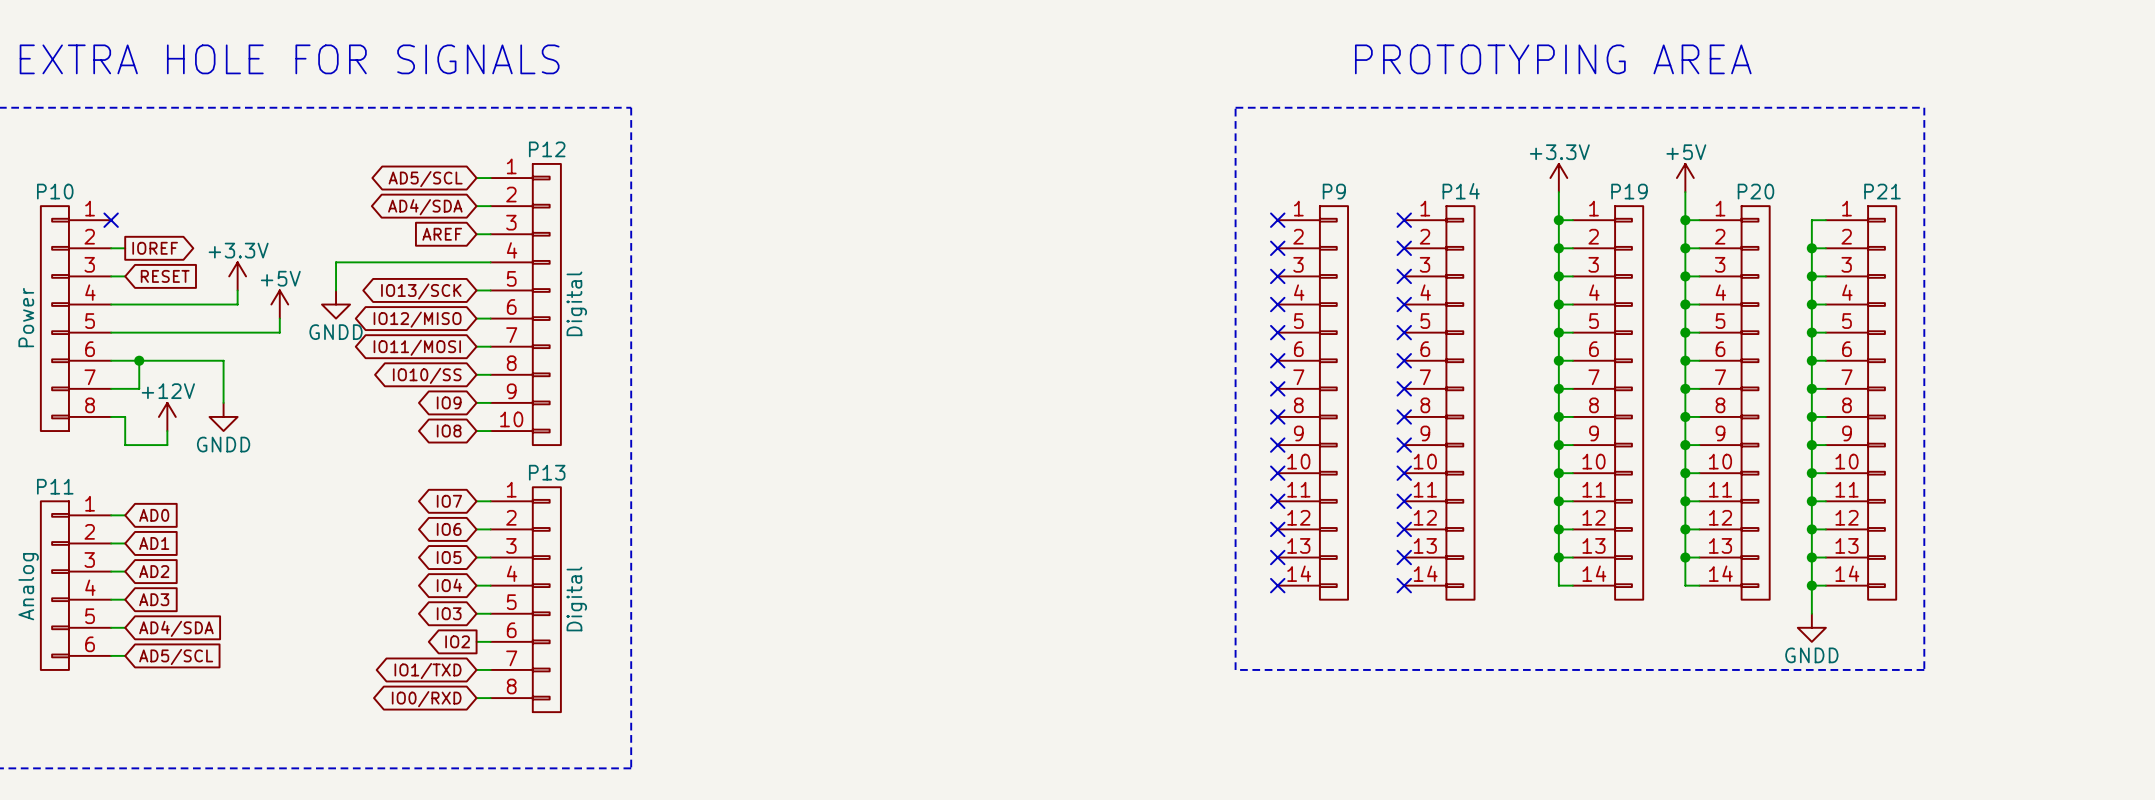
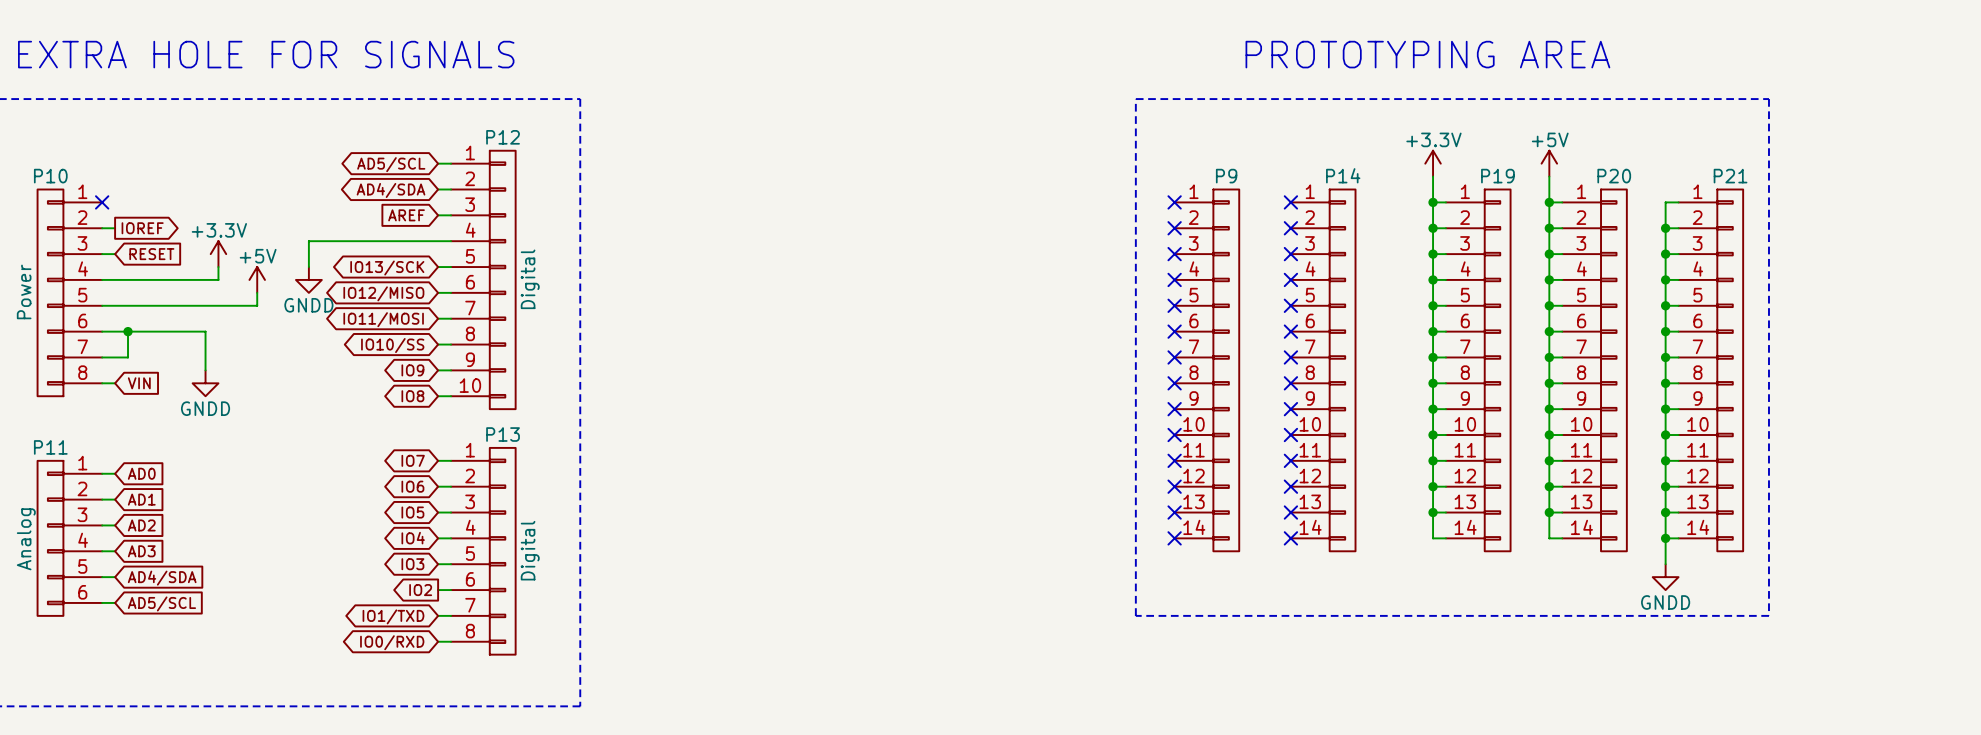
wire: (125, 416) (125, 445) (167, 445) (167, 431) -> none
global label: none -> VIN (139, 383)
power symbol: +12V (167, 416) -> none

